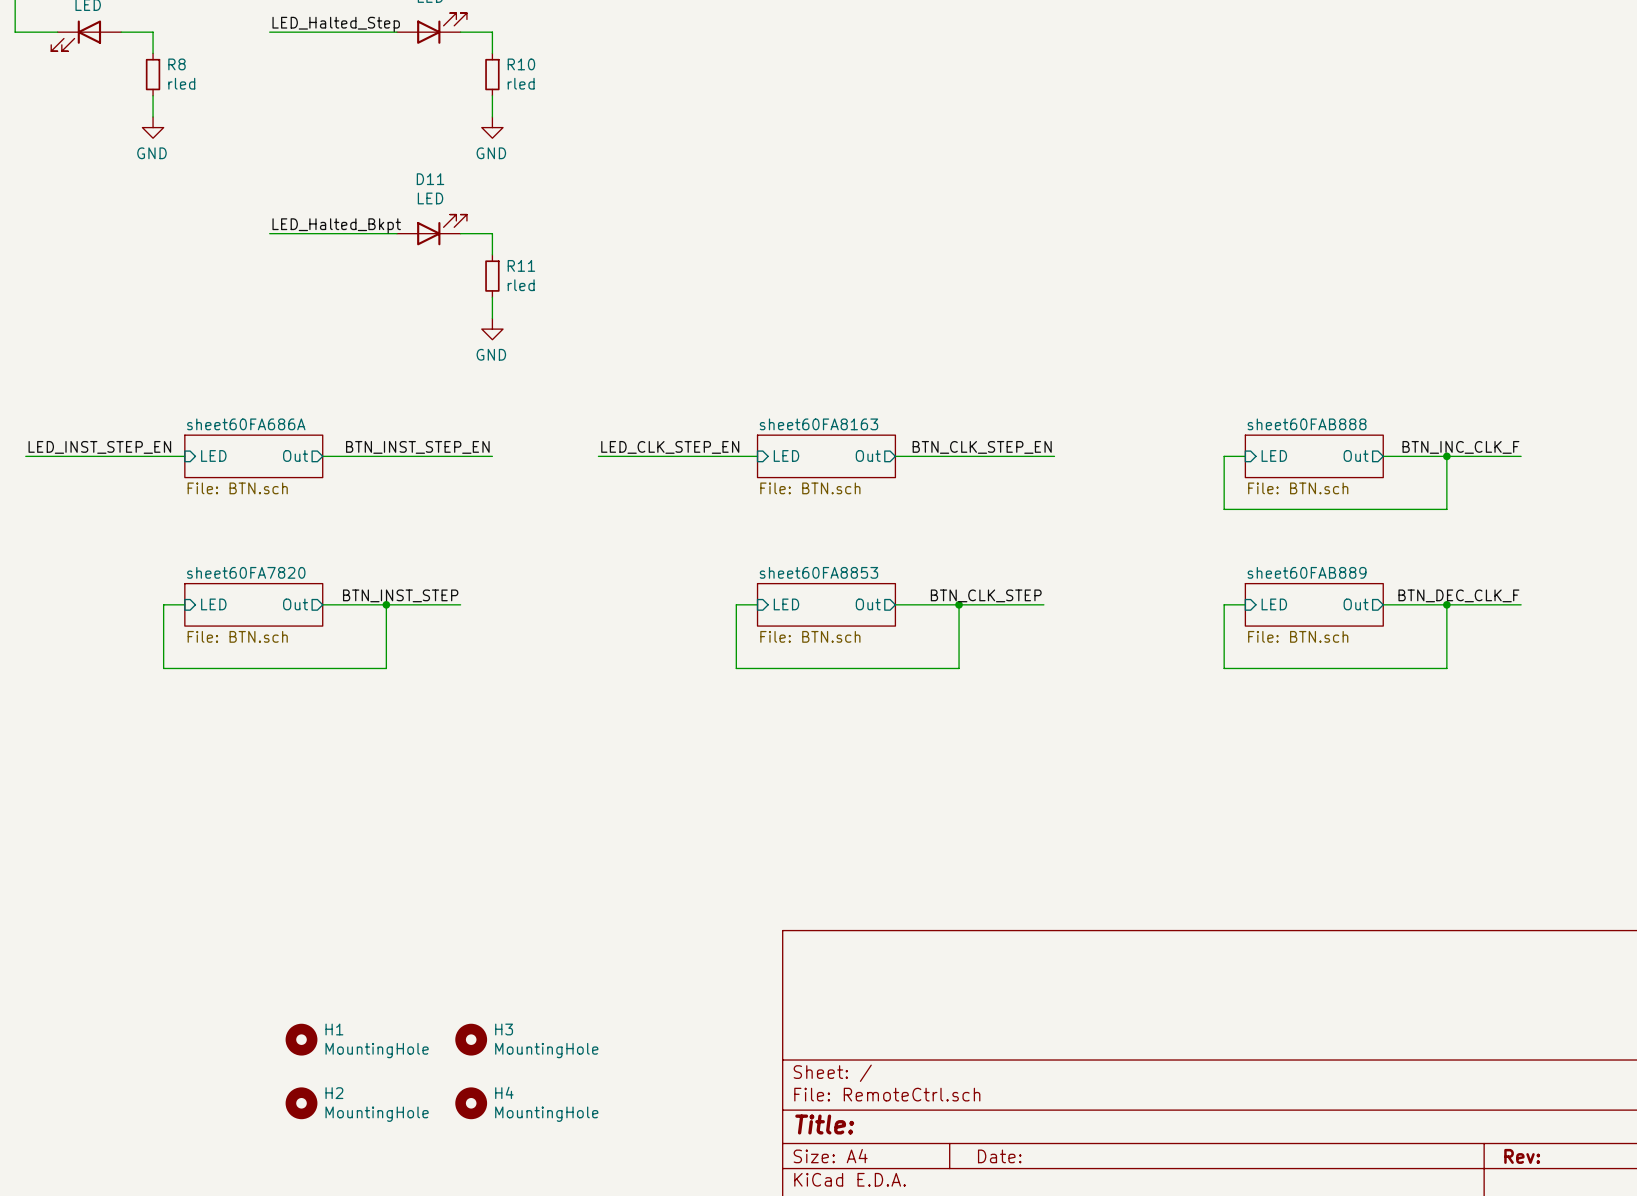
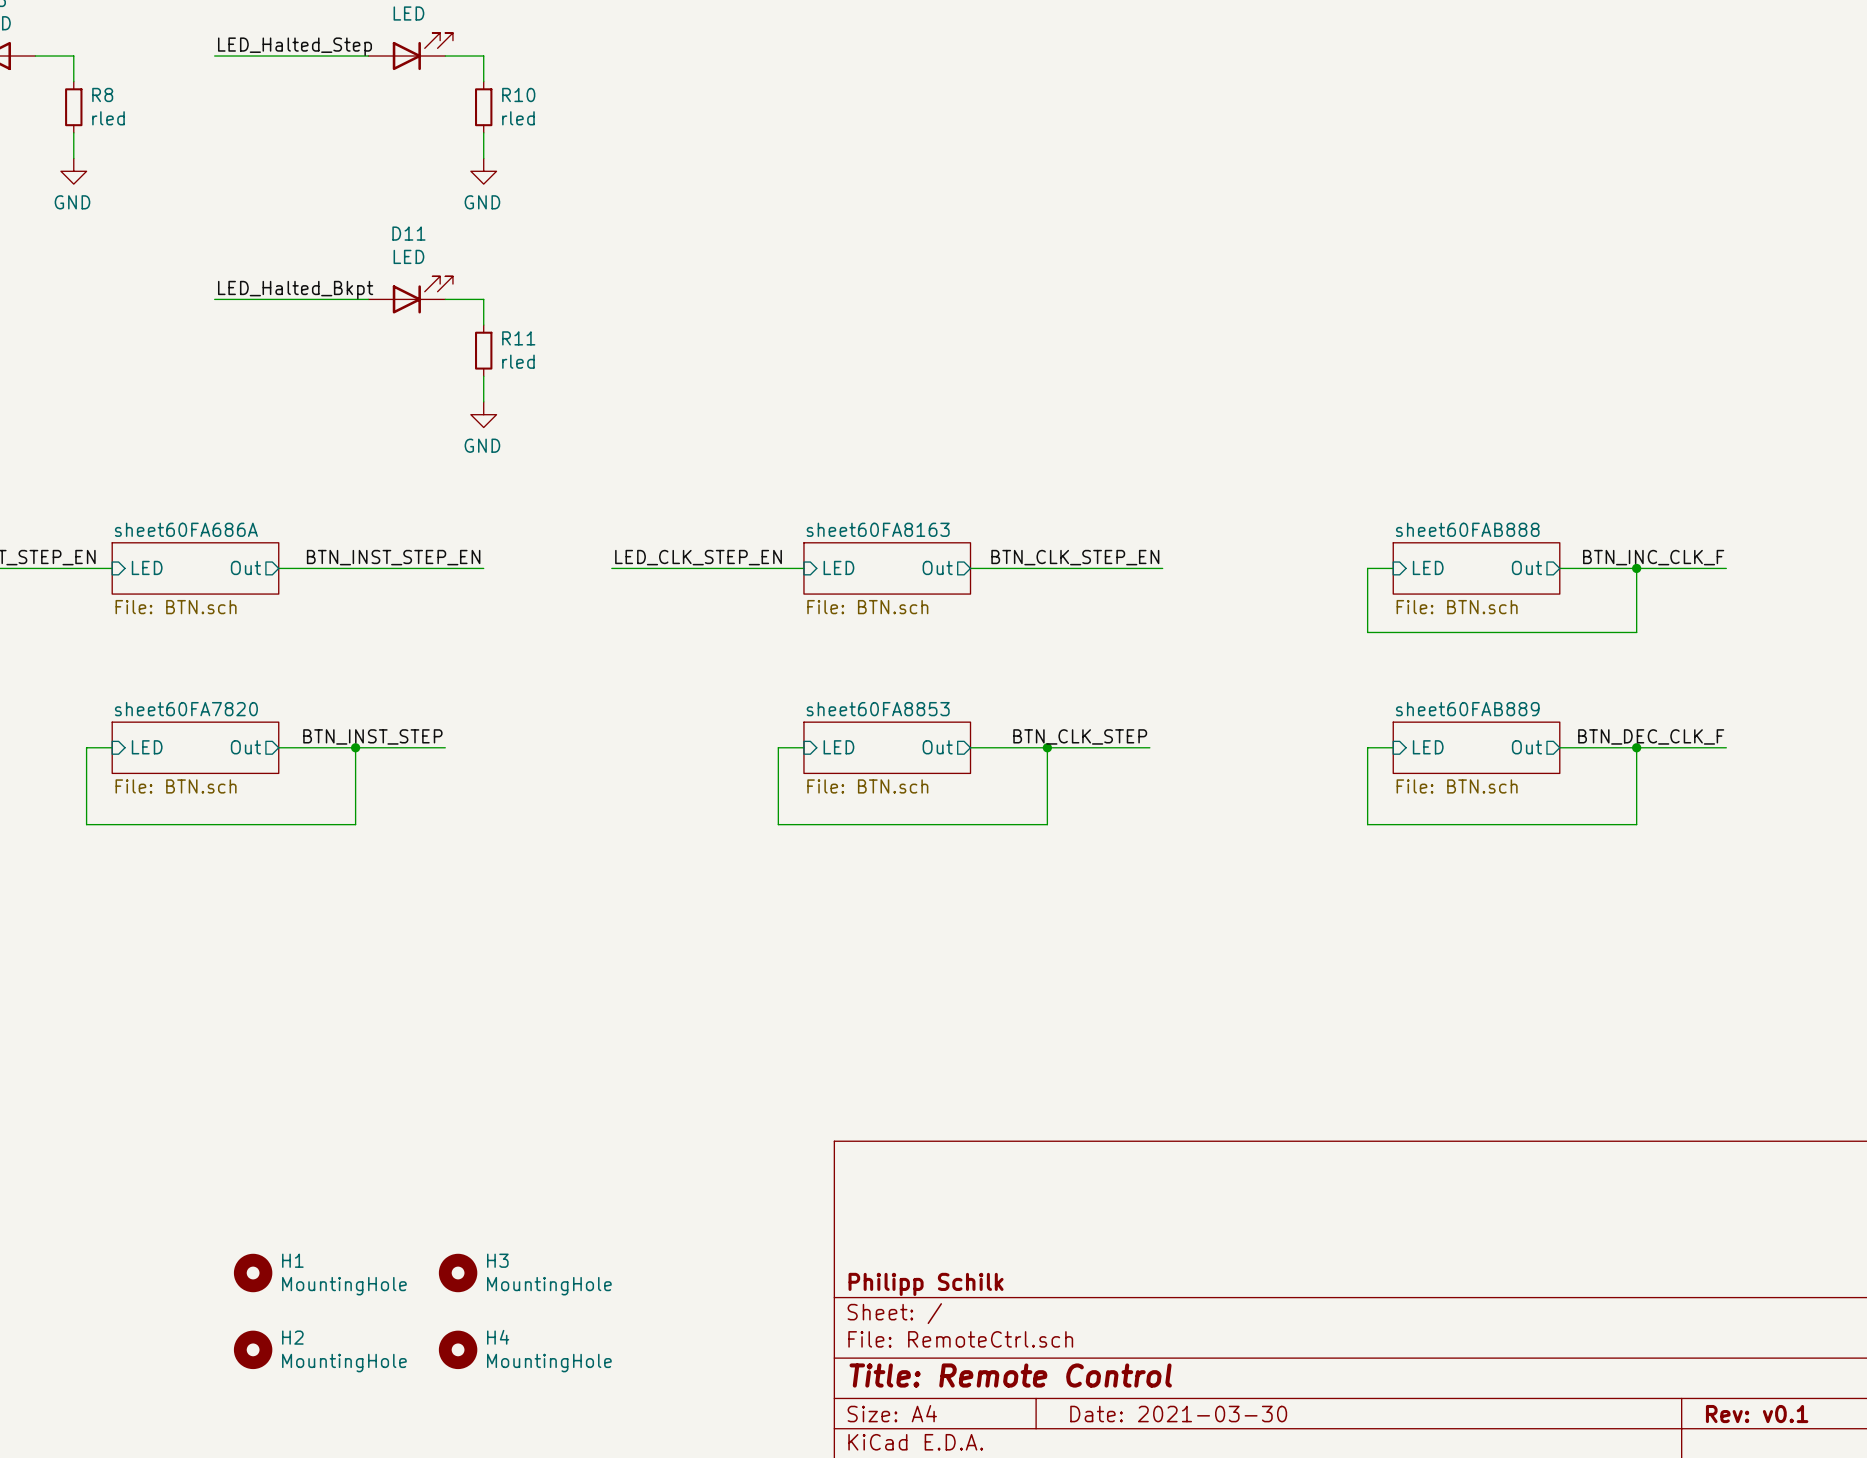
title block: none -> Philipp Schilk (926, 1284)
title block: Title: (824, 1124) -> Title: Remote Control (1010, 1375)
title block: Date: (999, 1156) -> Date: 2021-03-30 (1178, 1414)
title block: Rev: (1522, 1156) -> Rev: v0.1 (1757, 1414)

